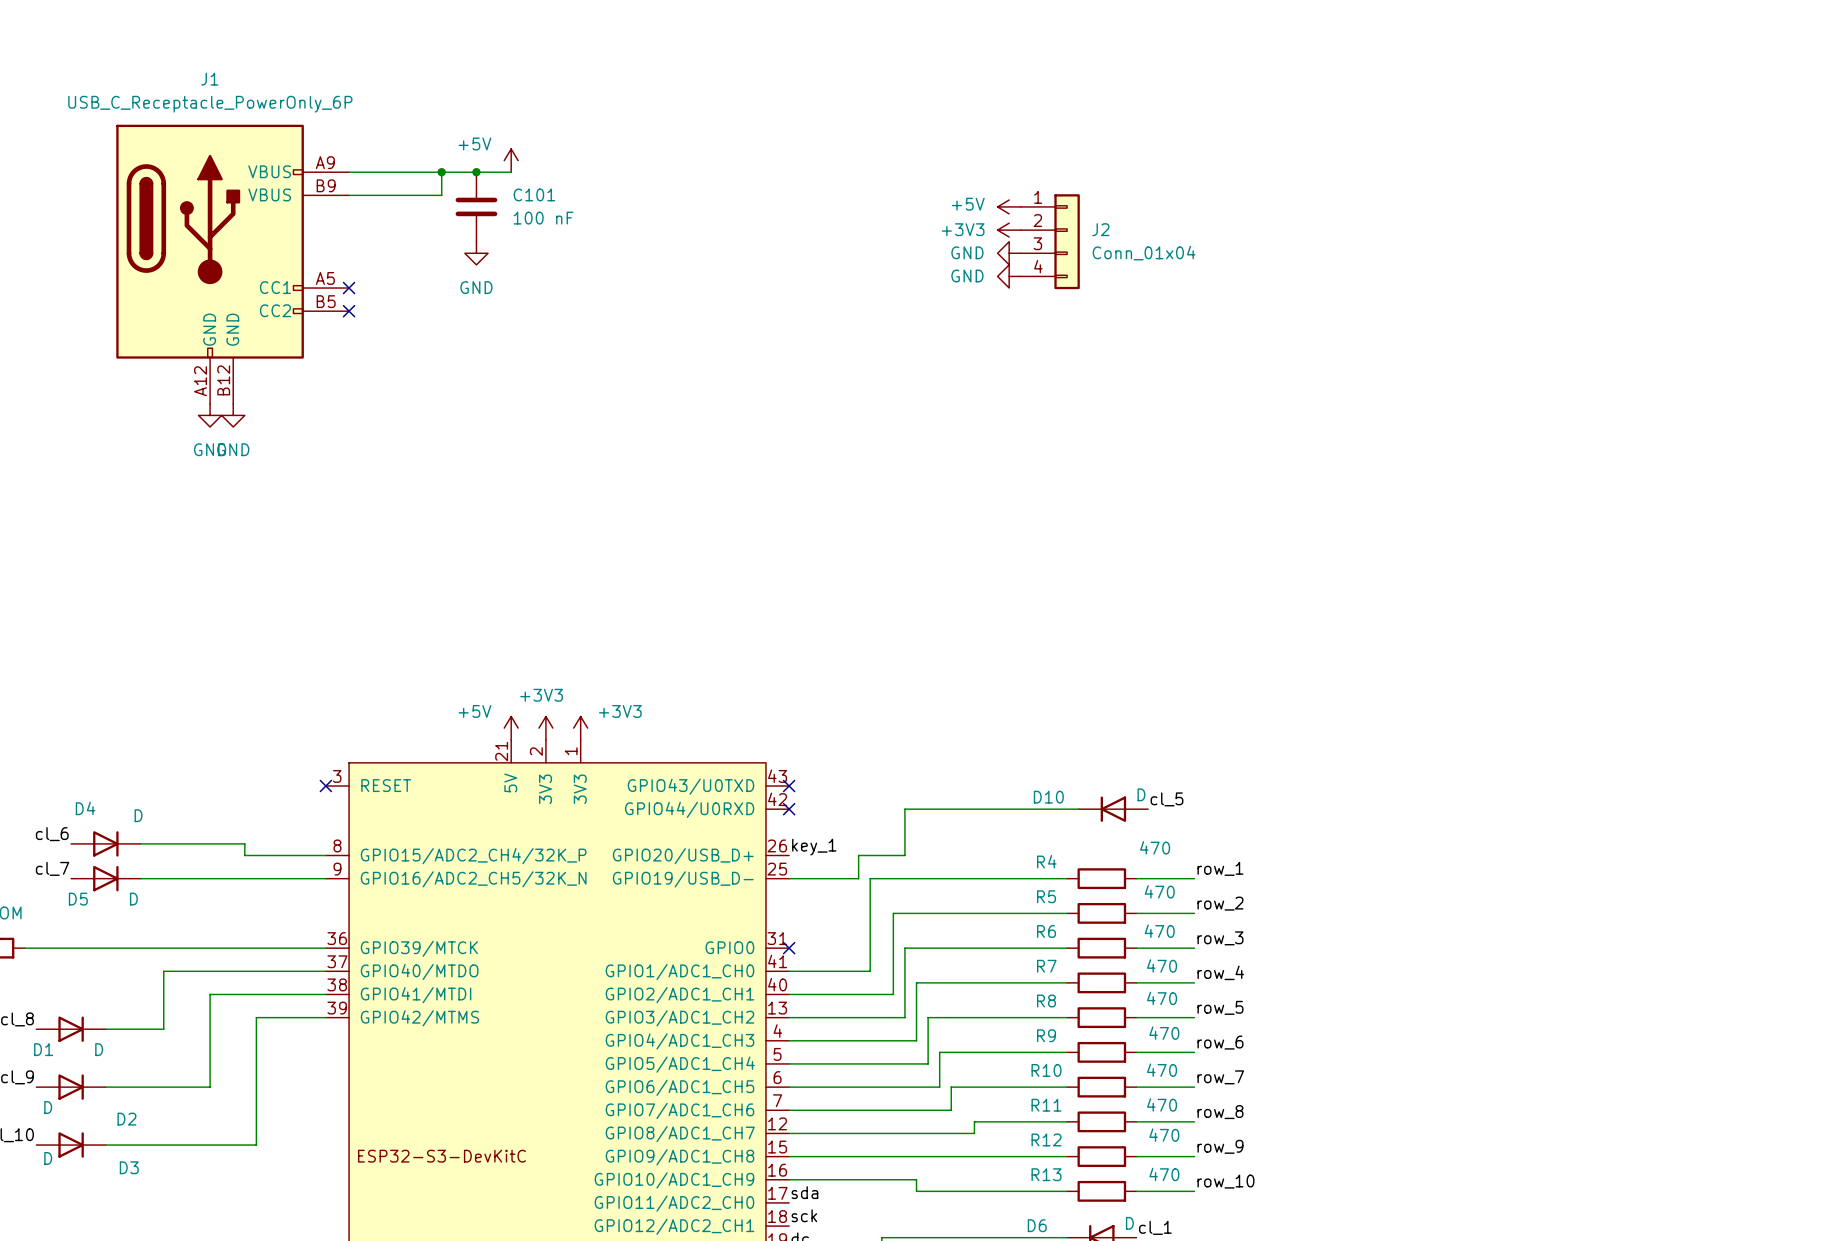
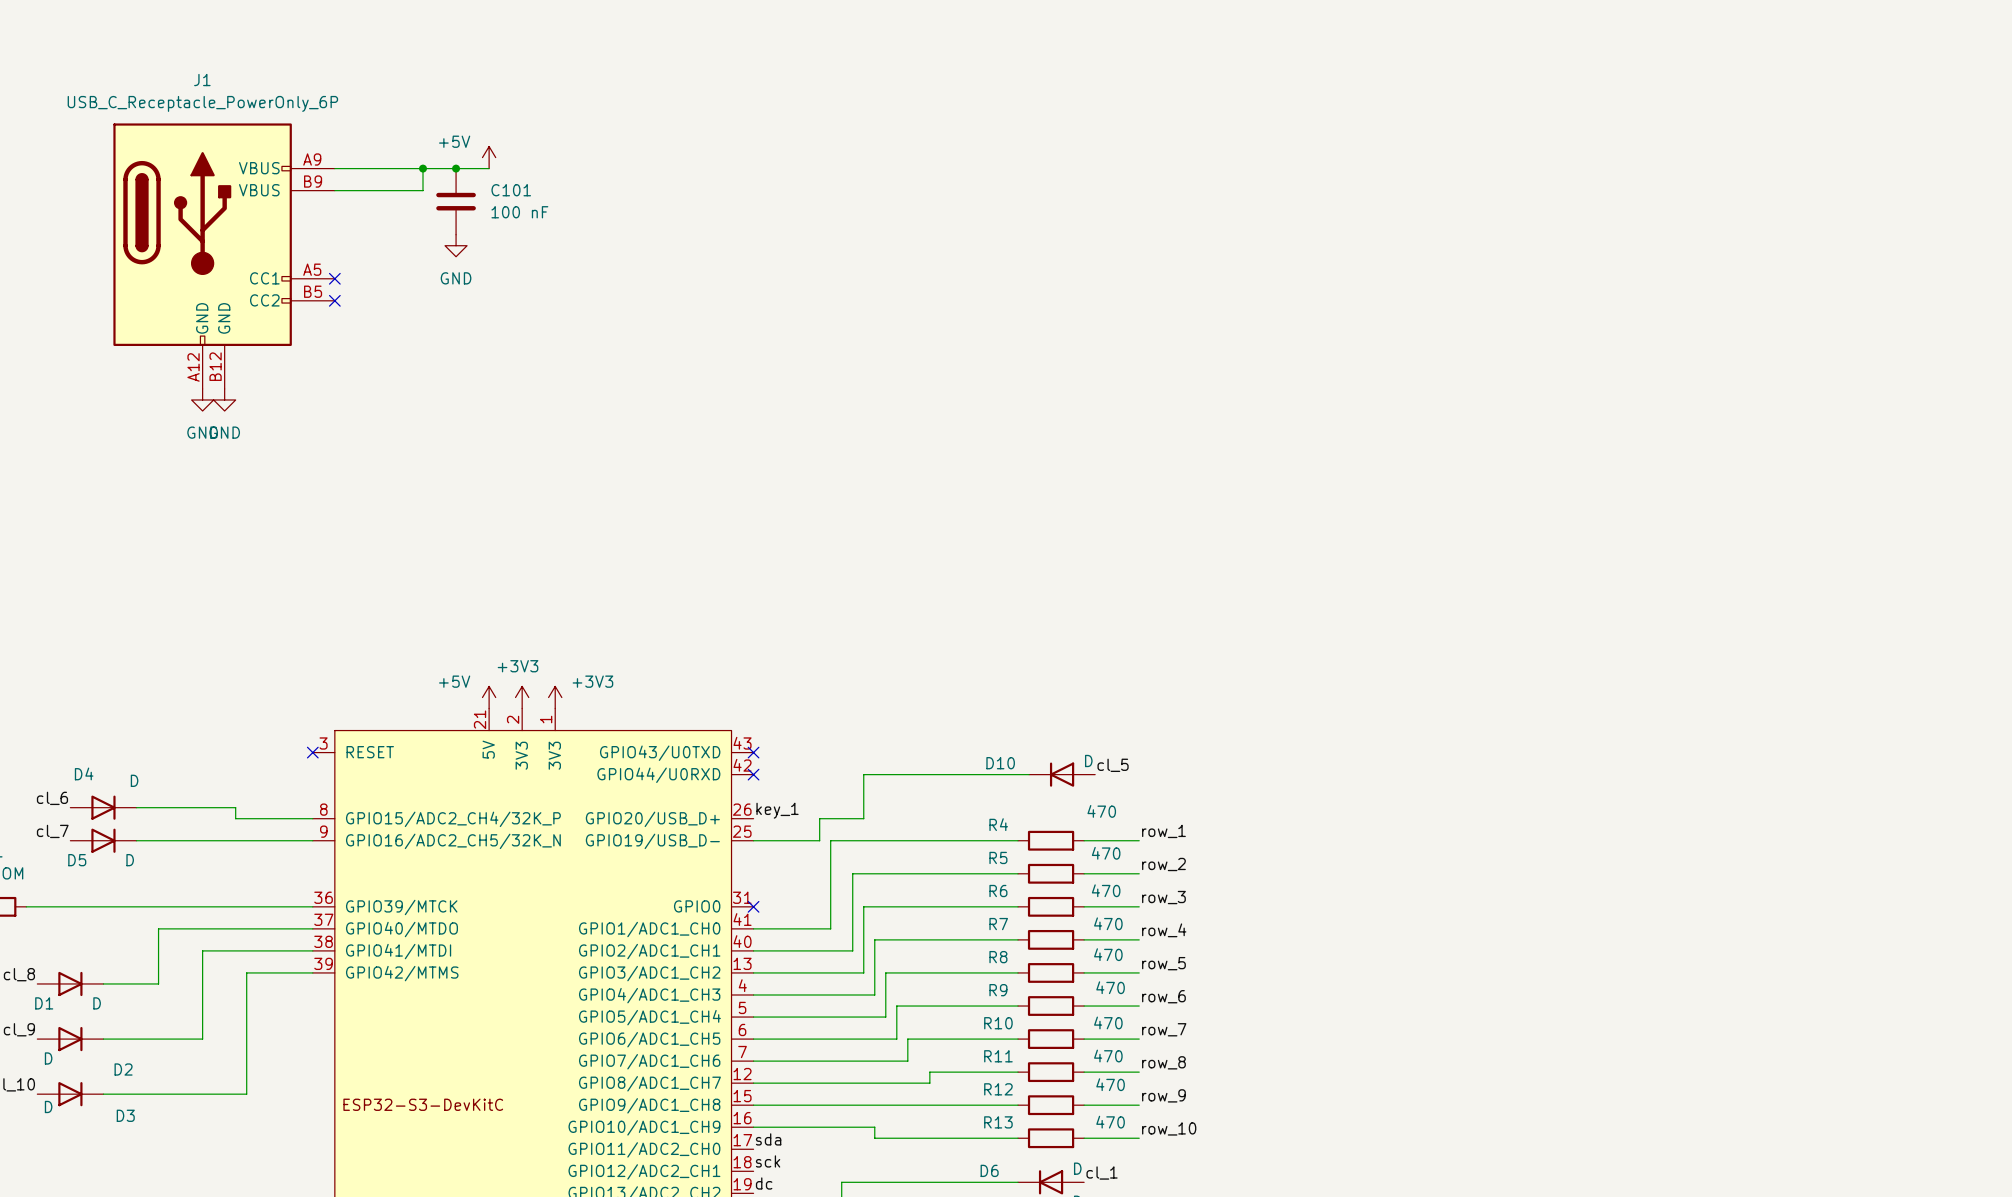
power symbol: +5V (1009, 206) -> none
power symbol: +3V3 (1009, 230) -> none
J2: Conn_01x04 (1050, 241) -> none
power symbol: GND (1009, 253) -> none
power symbol: GND (1009, 276) -> none

